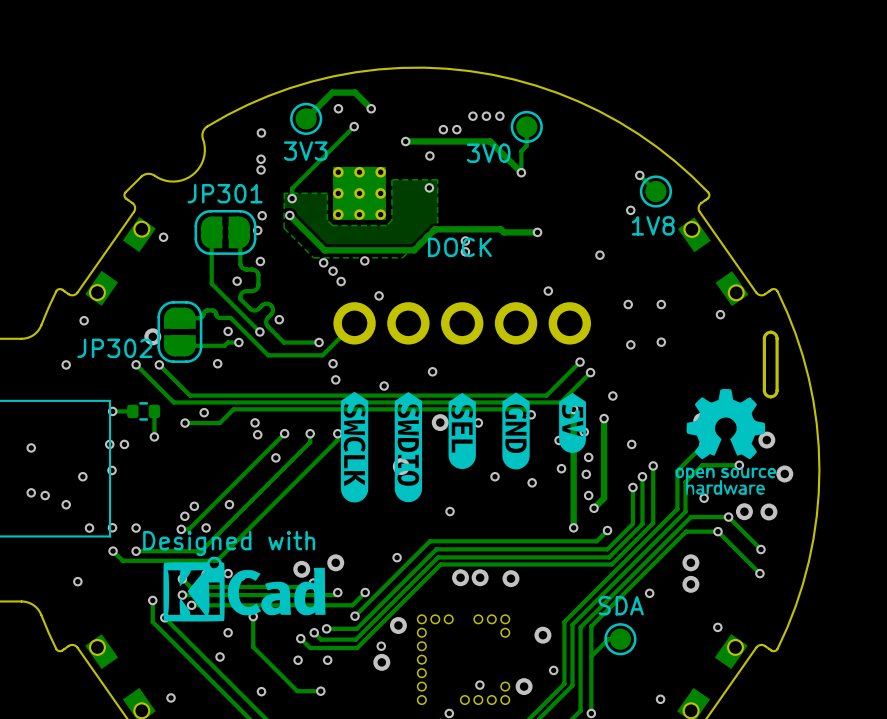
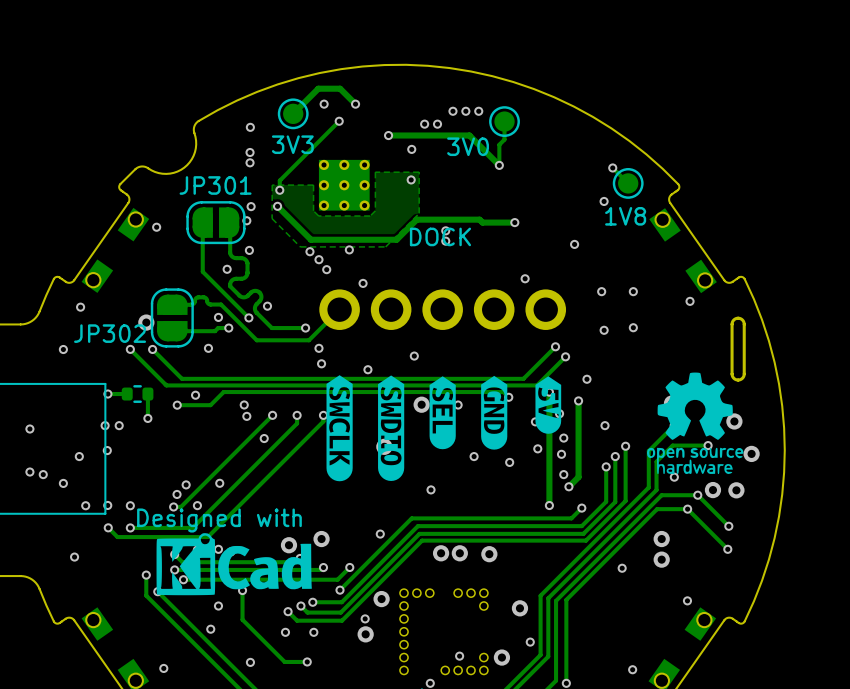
track: (620, 639) (608, 639) (591, 656) -> none
part: SDA (620, 639) -> none

